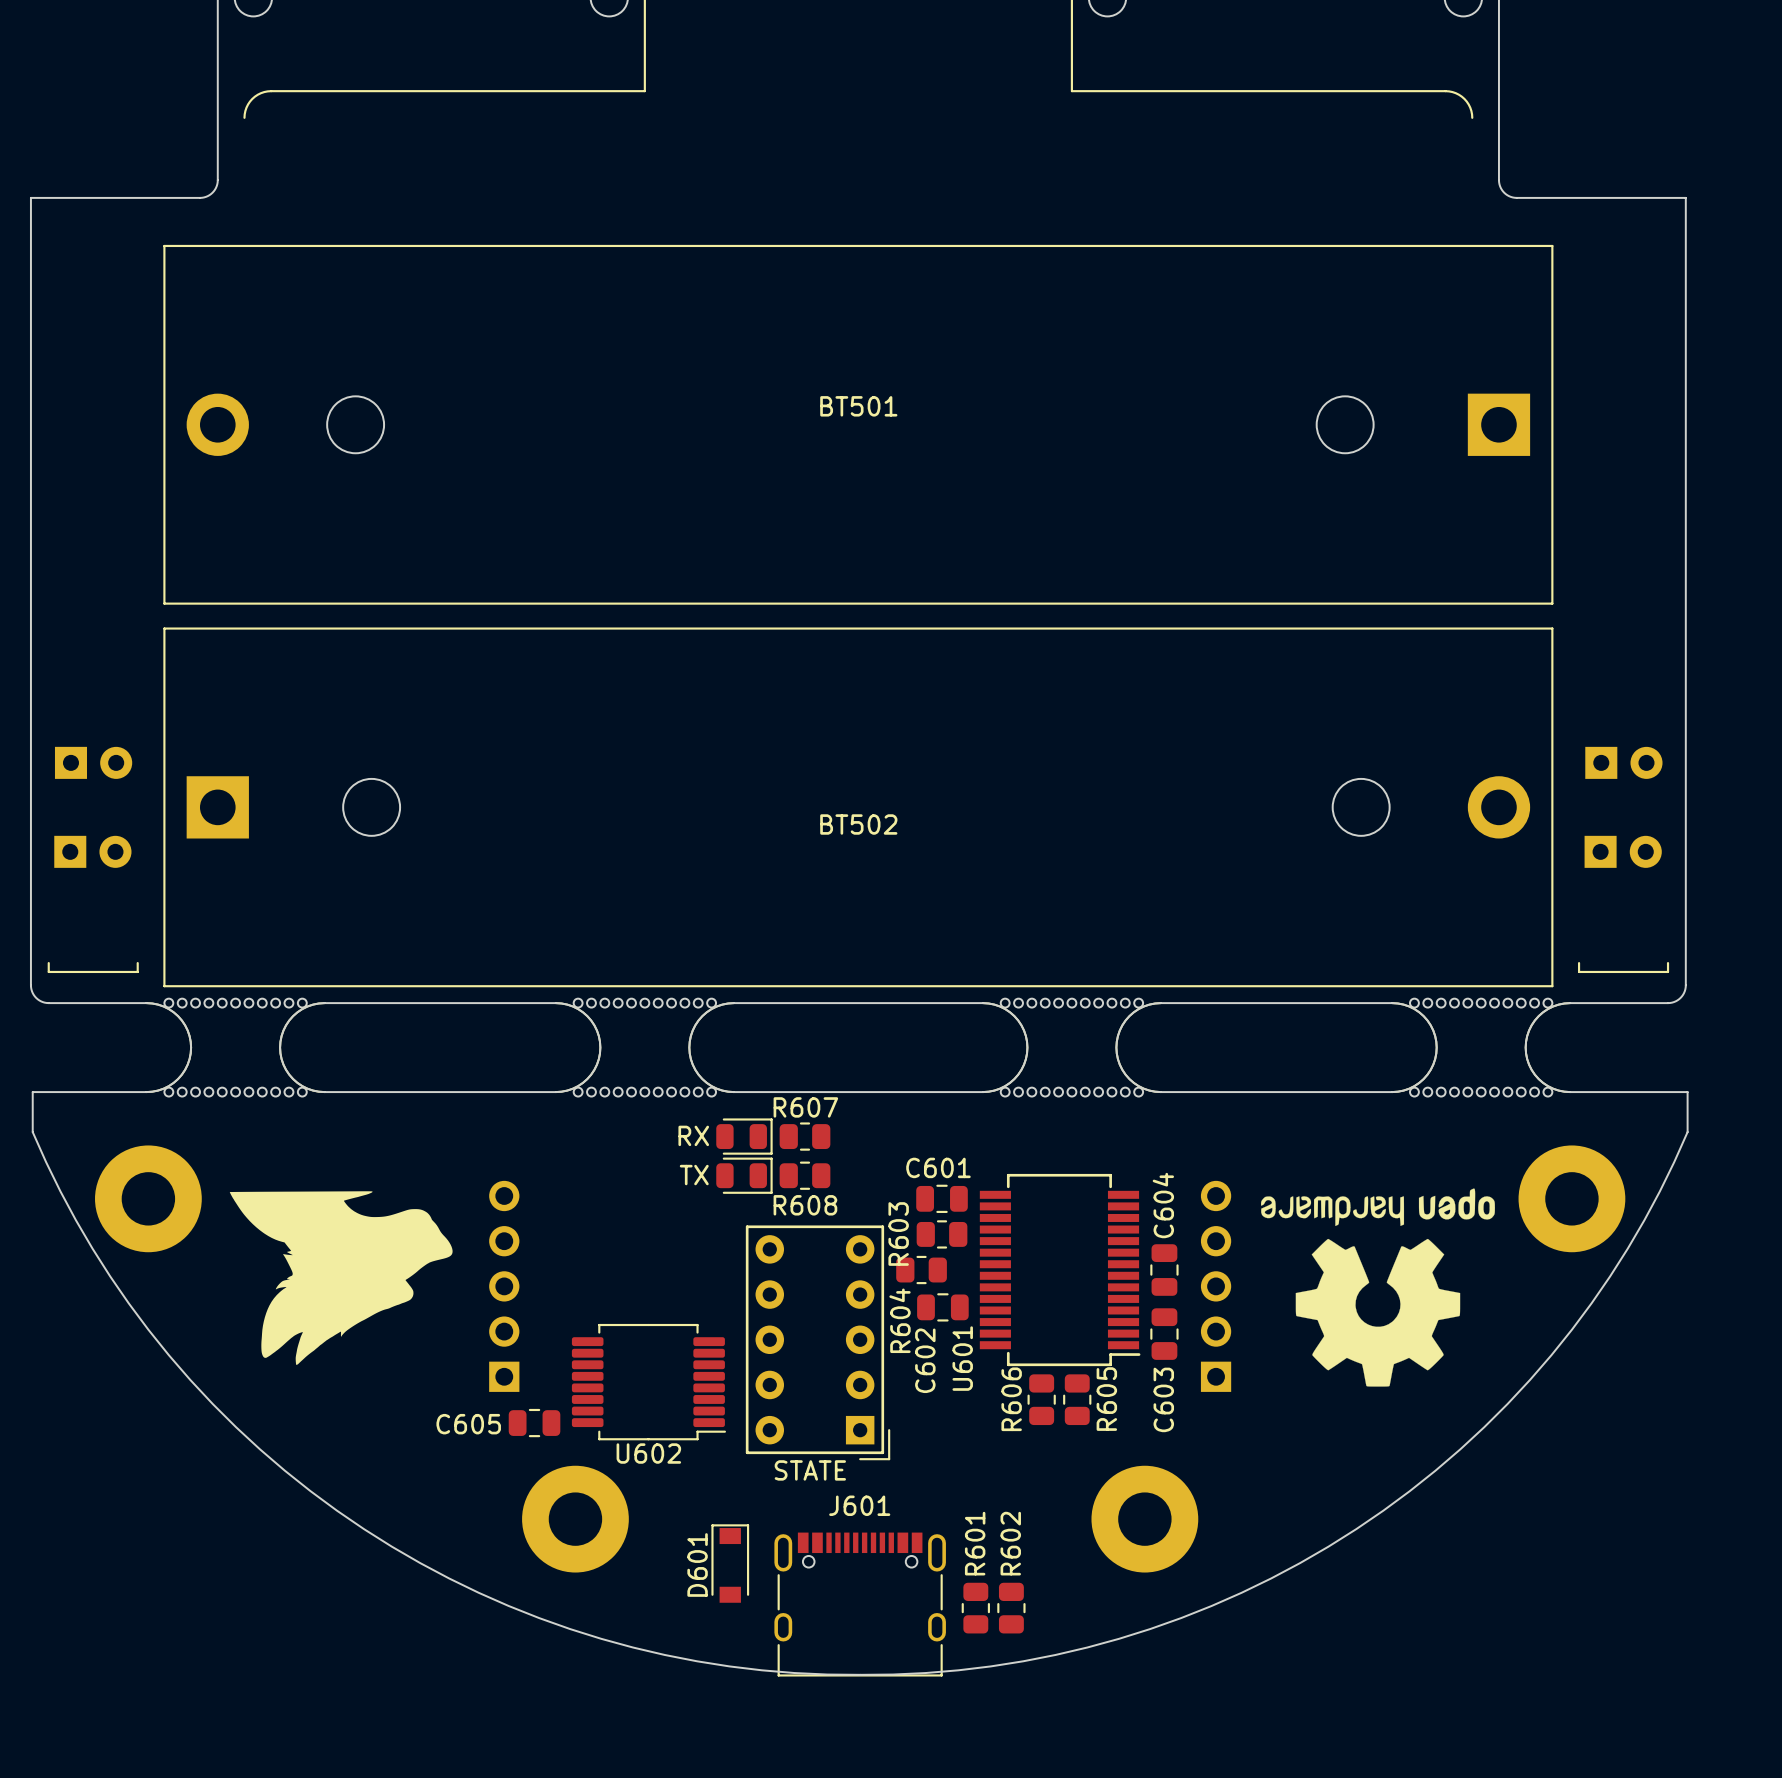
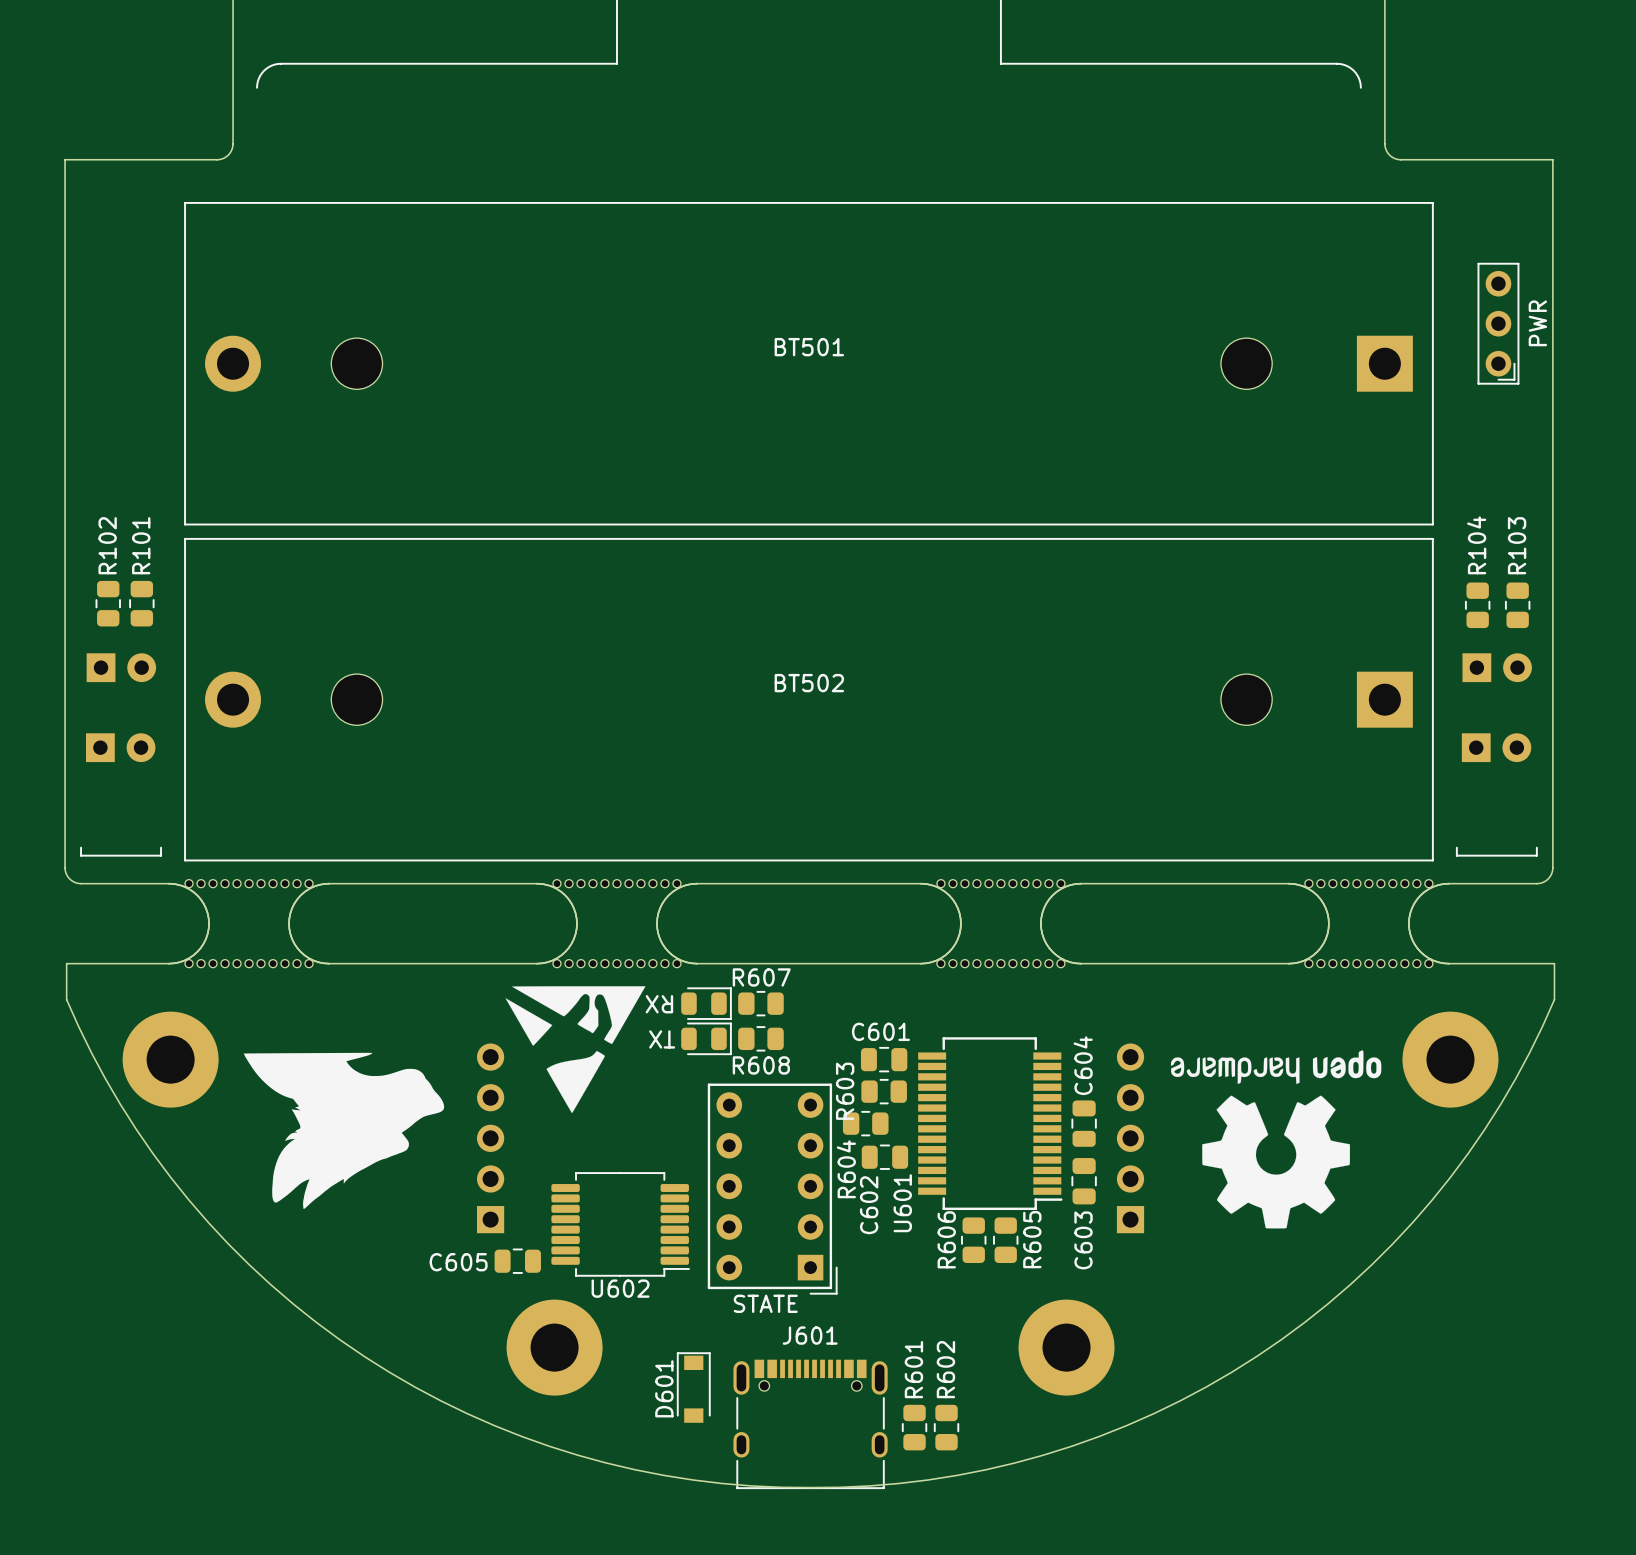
part: none -> PWR (1498, 323)
R102: none -> (108, 603)
R101: none -> (141, 603)
R104: none -> (1477, 605)
R103: none -> (1517, 605)
BT502 rotation: 0° (858, 807) -> 180° (808, 699)
drawing: none -> [505, 986, 646, 1114]
part value rotation: 0° (693, 1135) -> 180° (659, 1004)
part value rotation: 0° (694, 1175) -> 180° (662, 1039)

